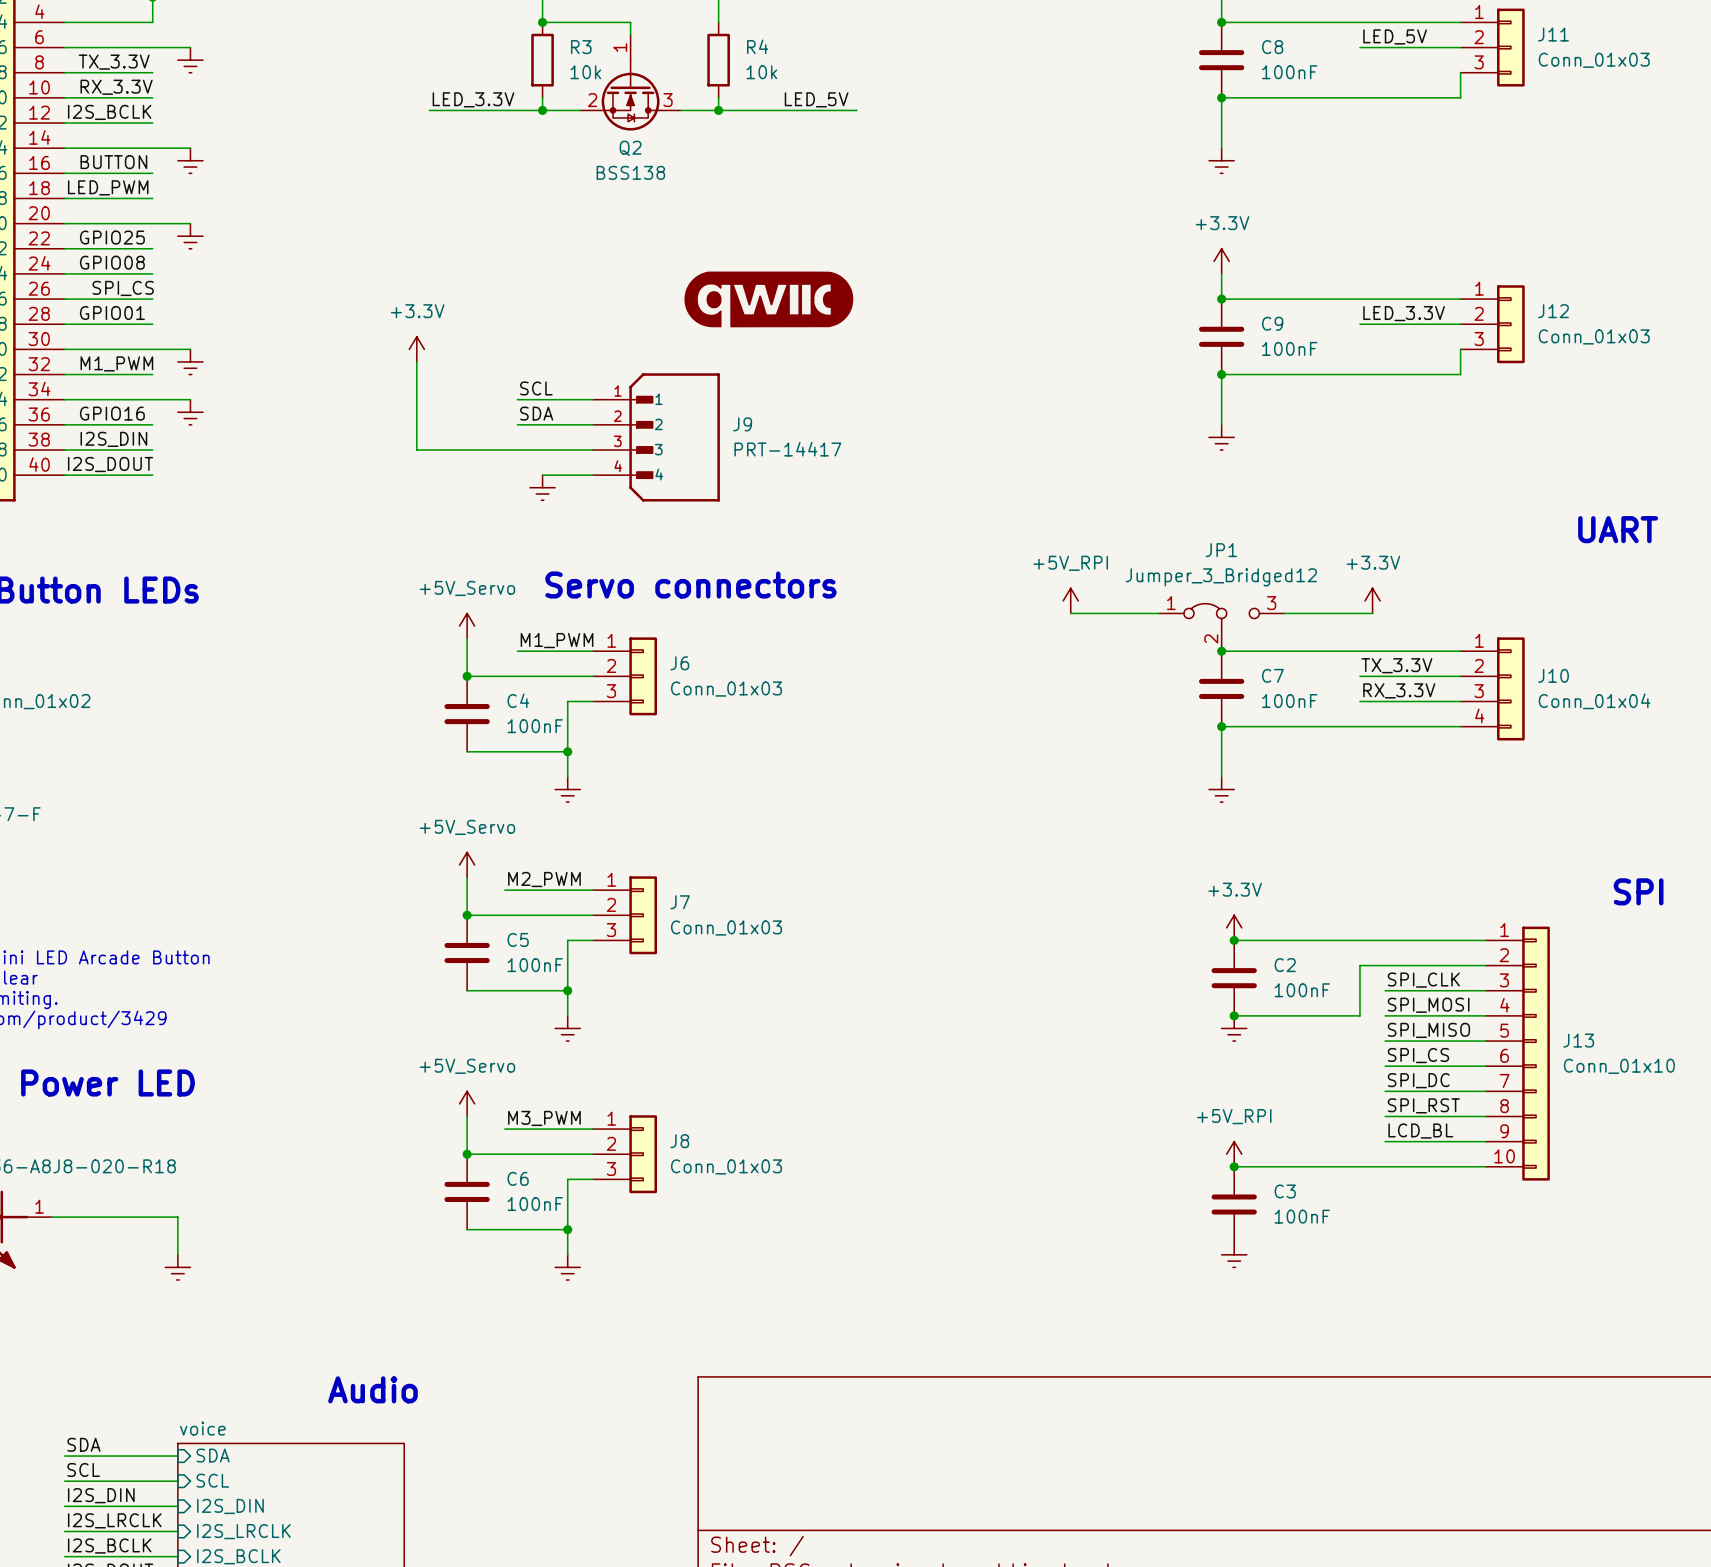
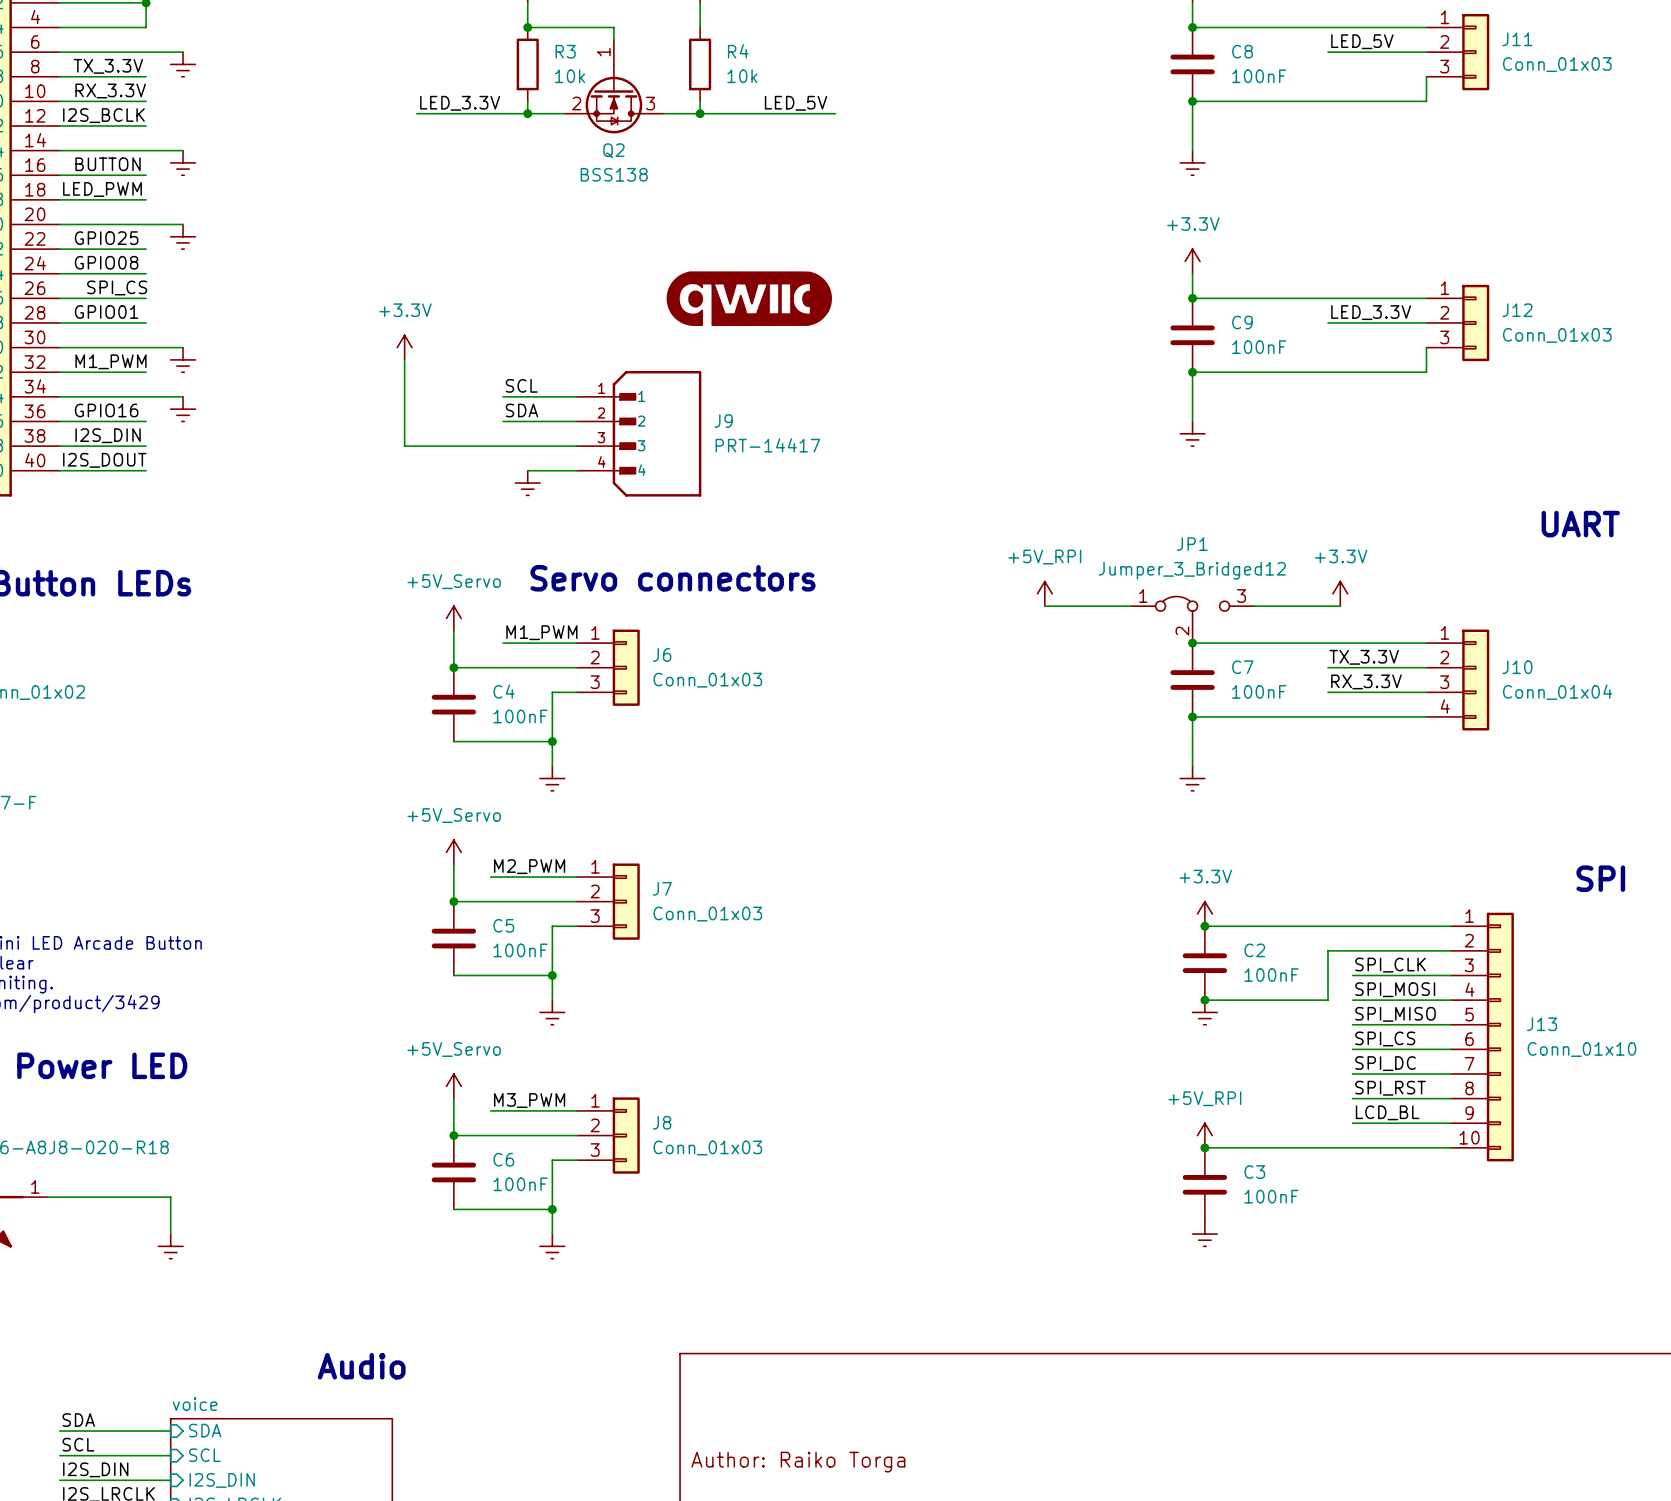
title block: none -> Author: Raiko Torga (798, 1462)

